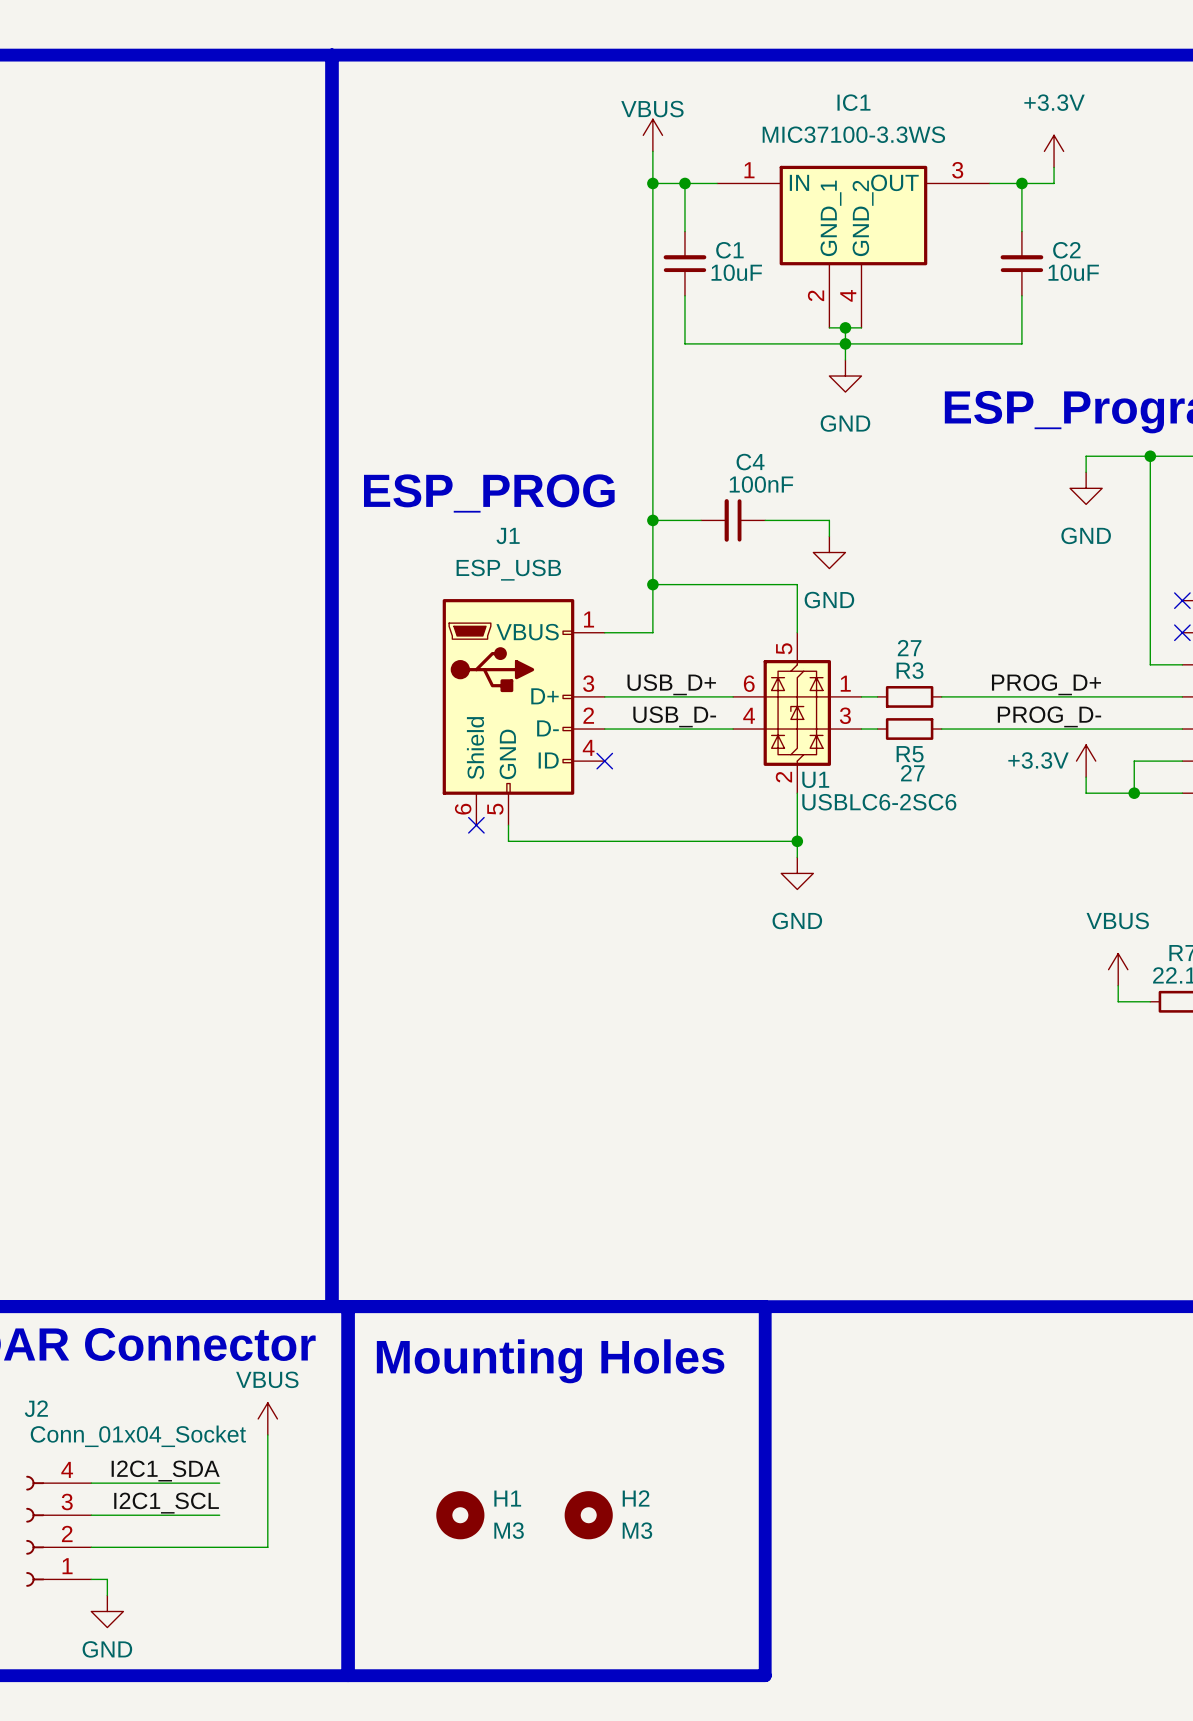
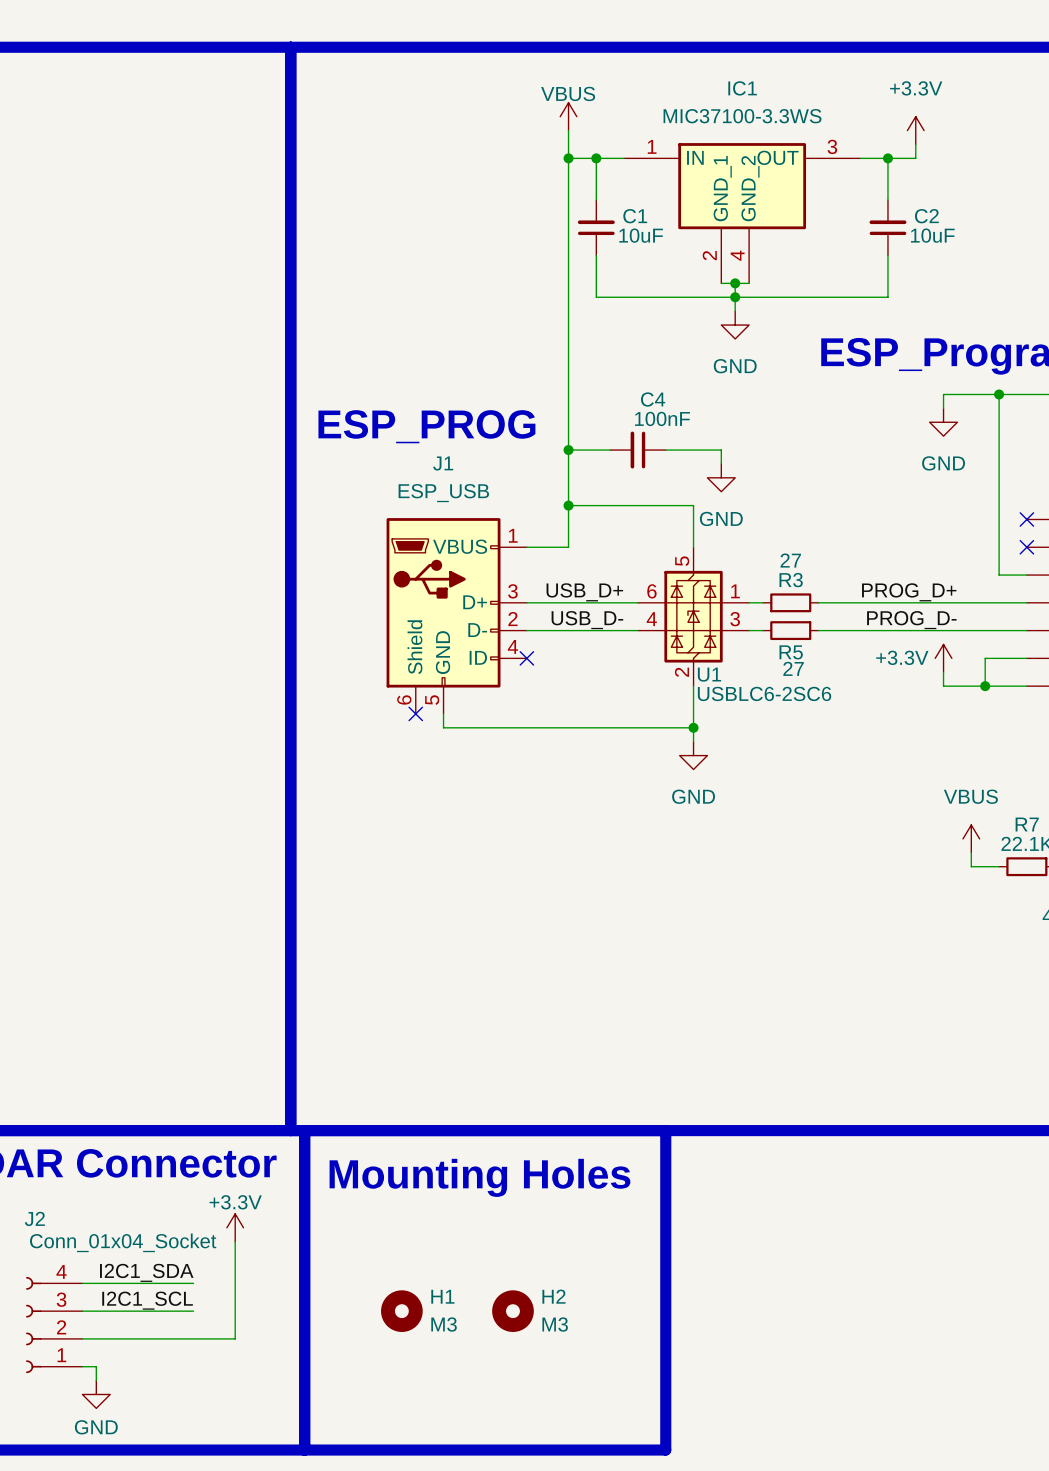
power symbol: VBUS (267, 1418) -> +3.3V (235, 1227)

